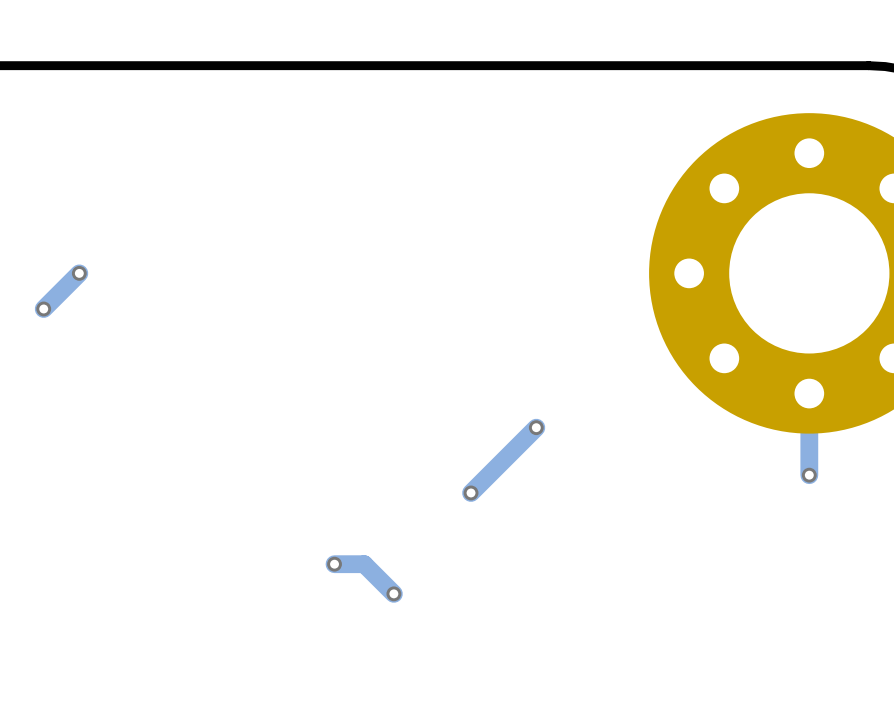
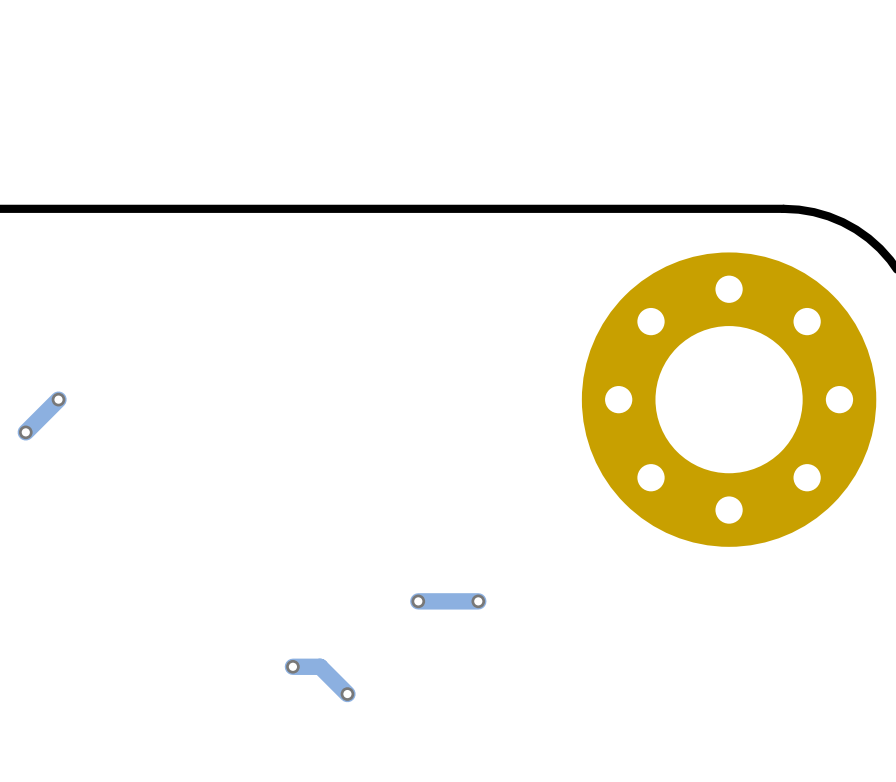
track: (809, 392) (809, 475) -> none
track: (536, 427) (471, 492) -> (478, 601) (418, 601)
via position: (536, 427) -> (478, 601)
via: (809, 475) -> none

